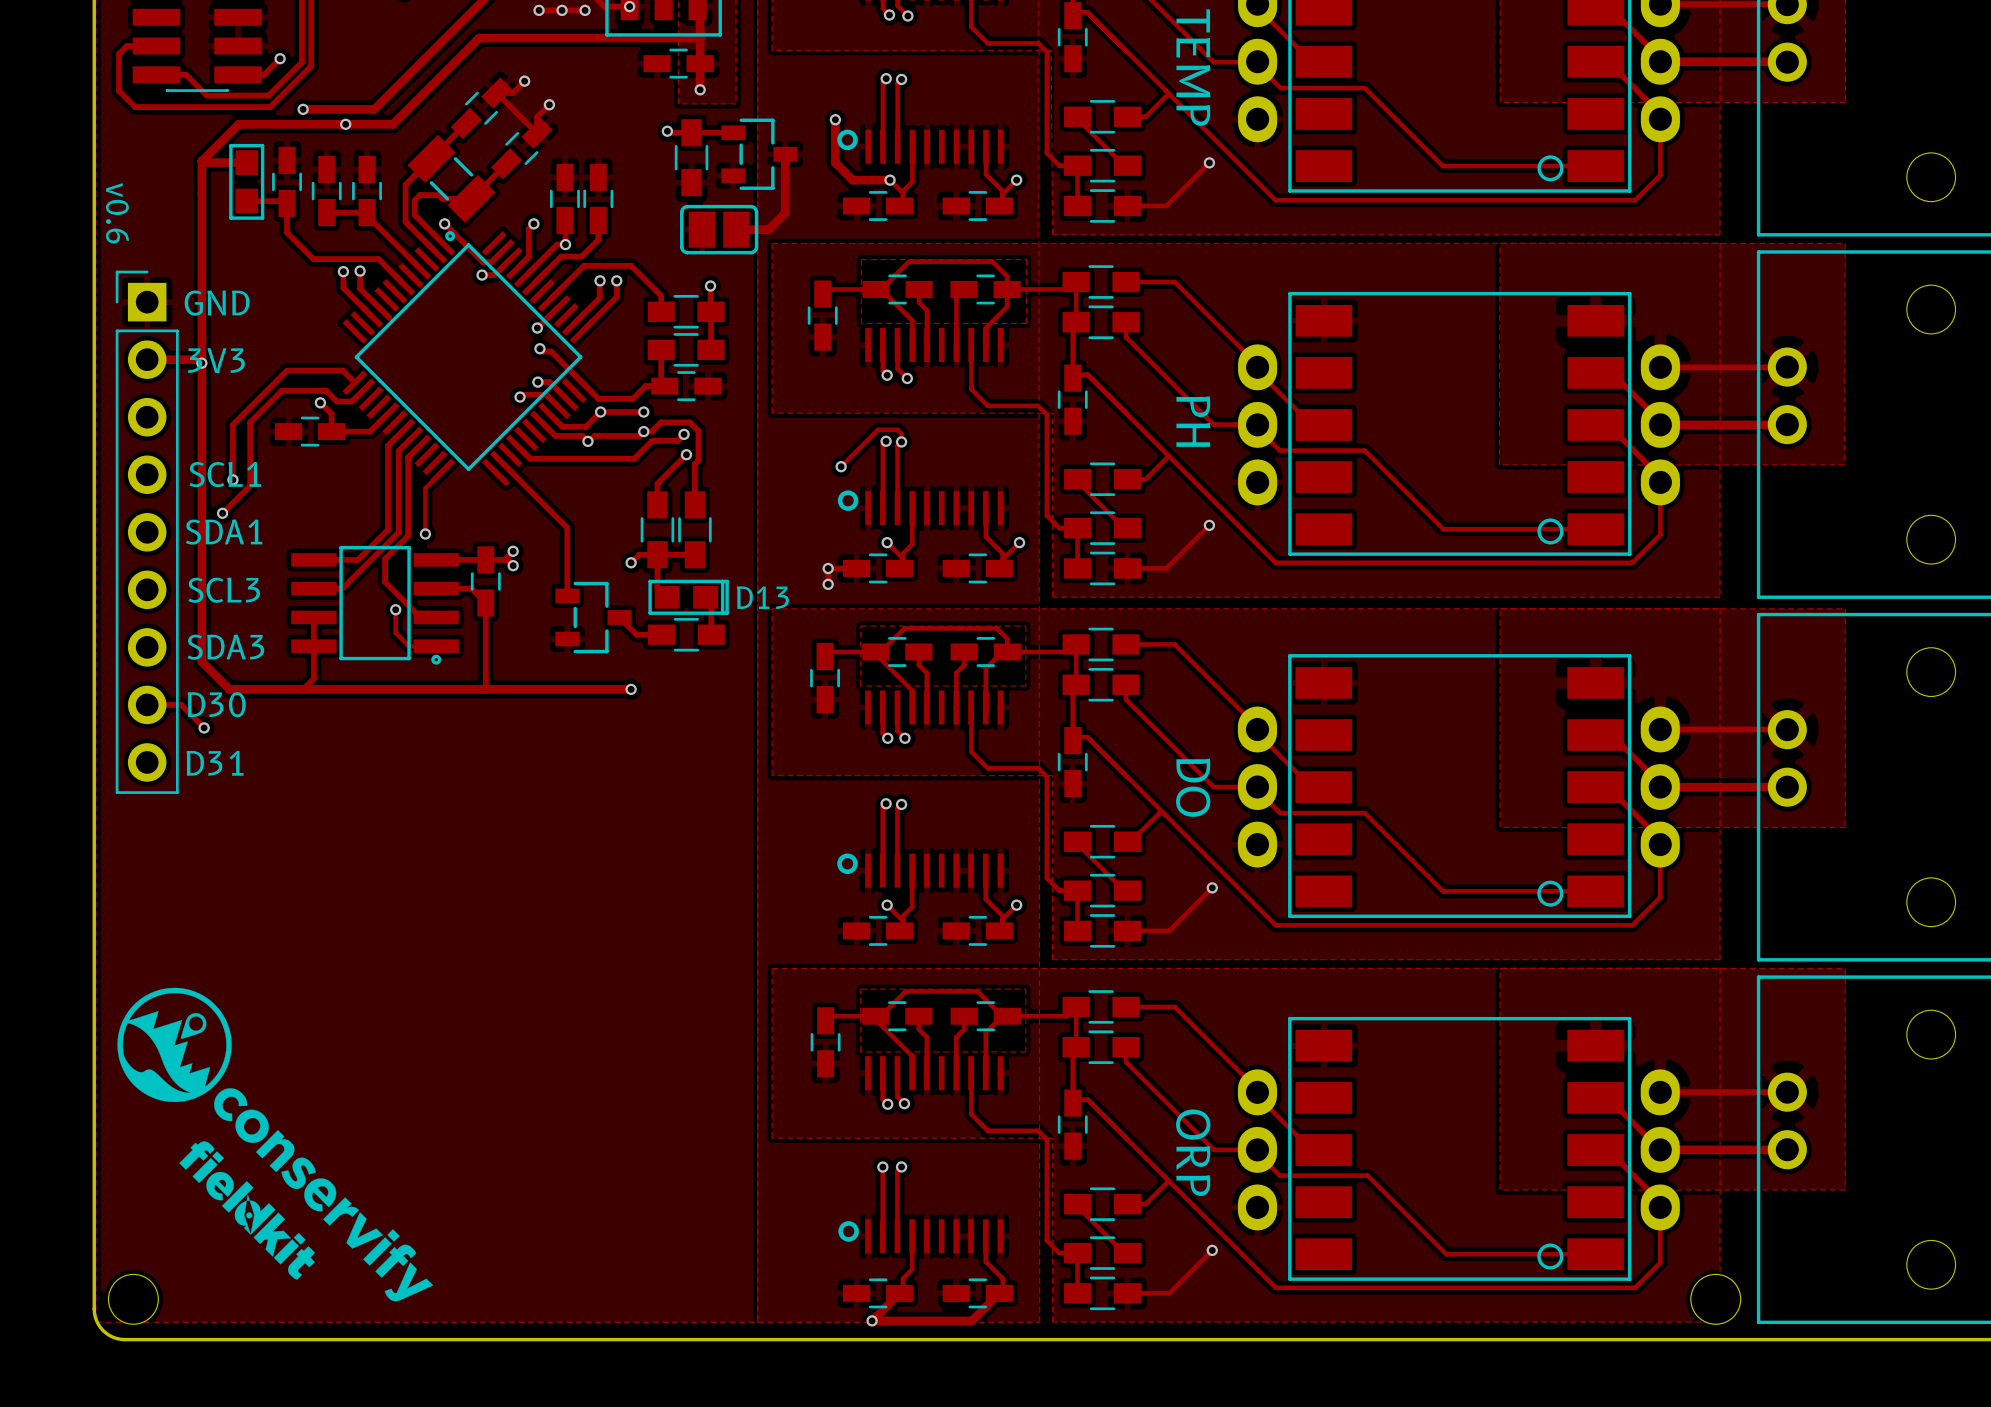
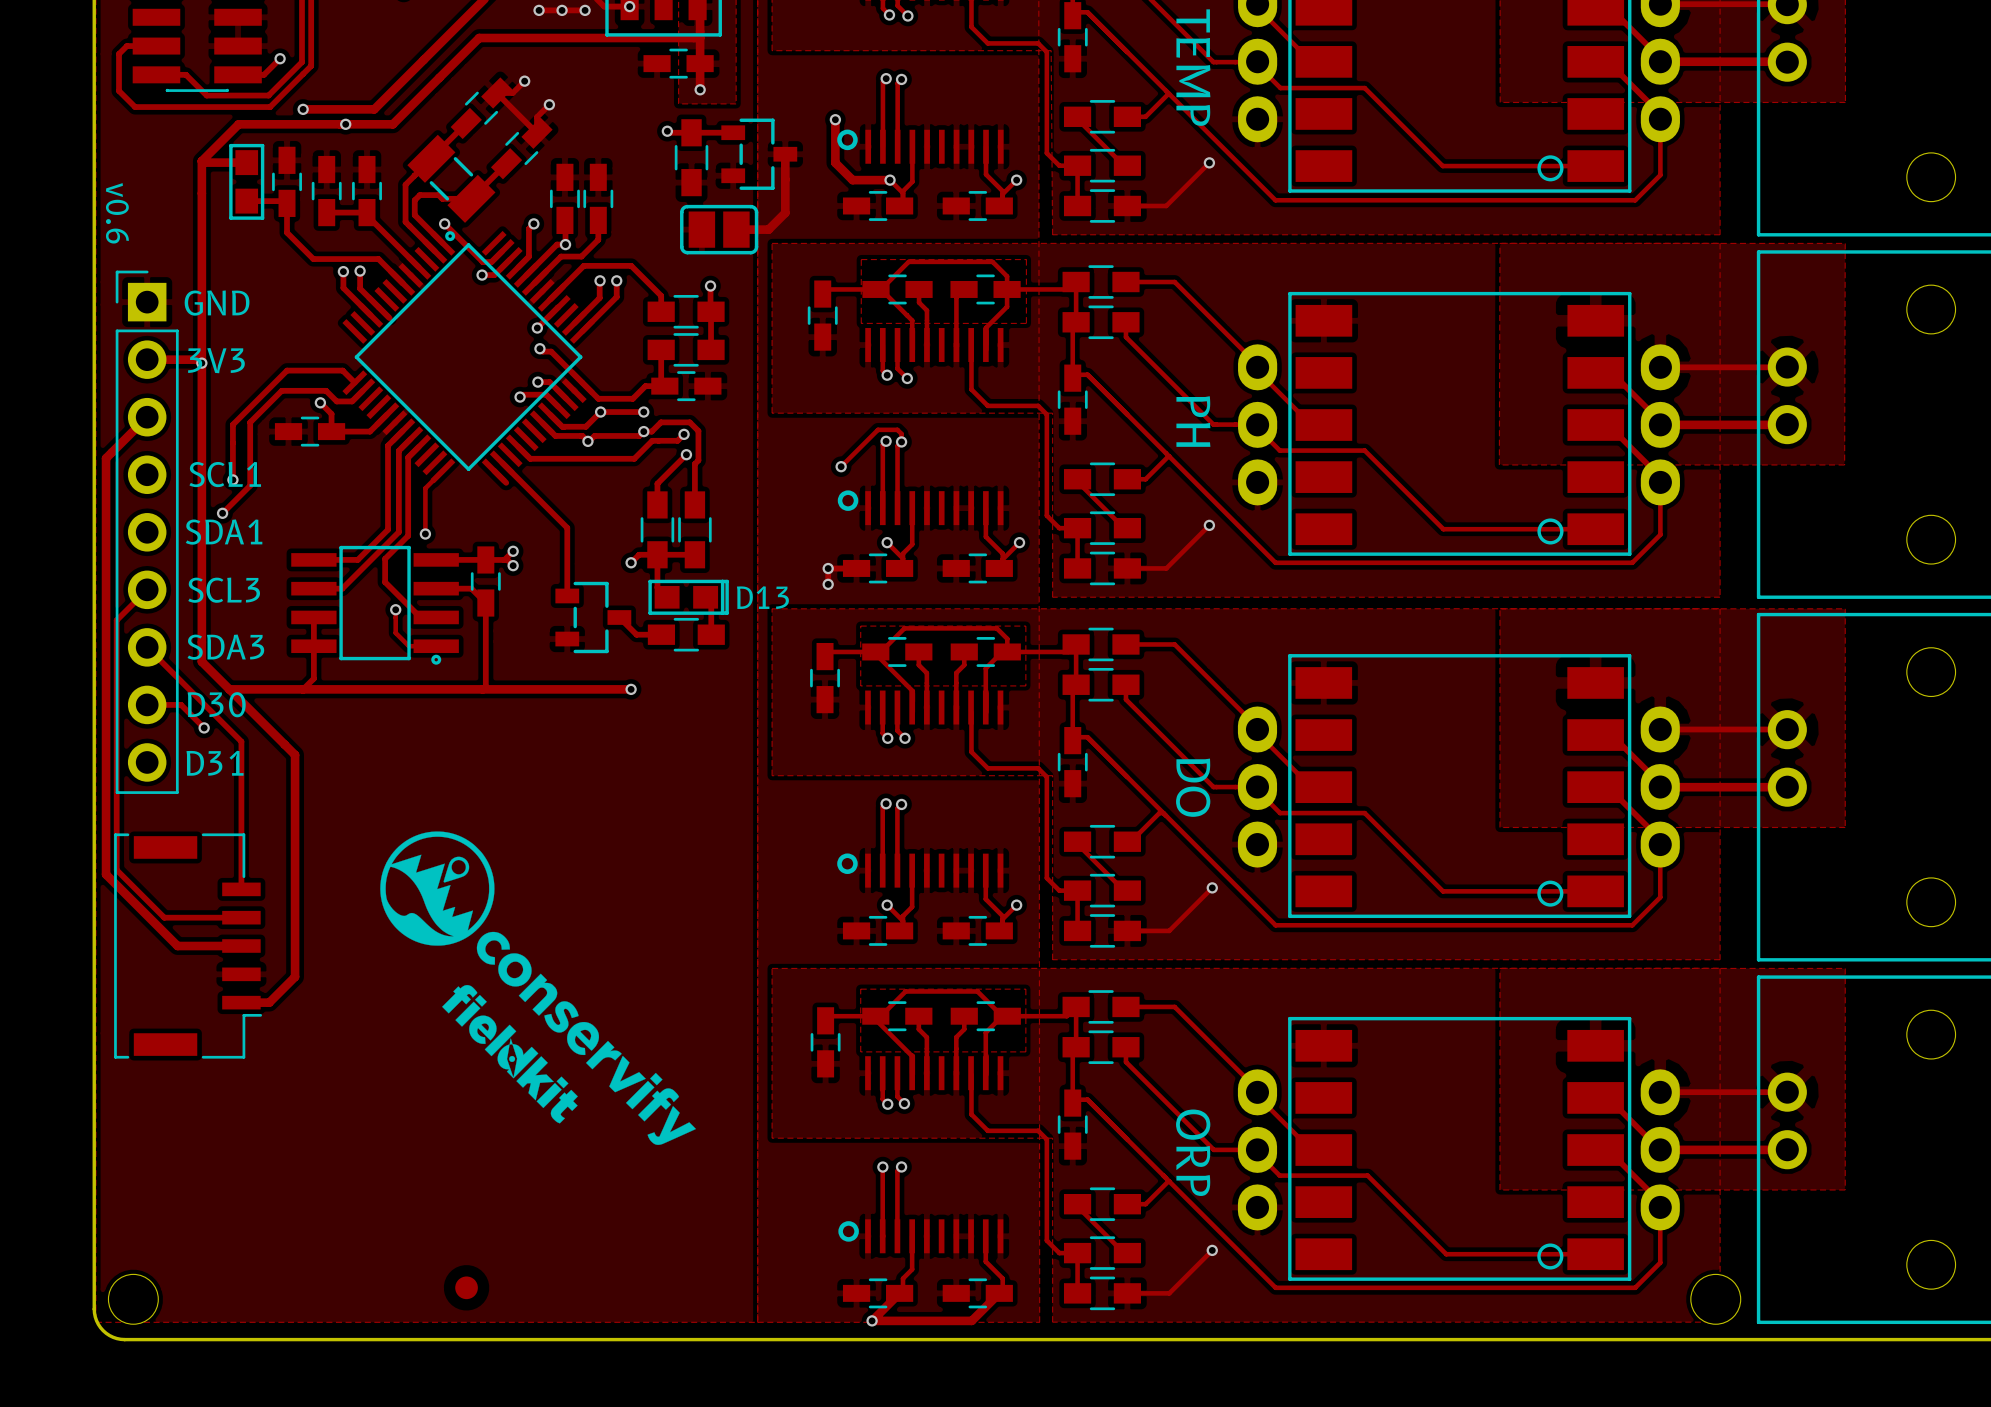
track: none -> (147, 417) (106, 458) (106, 874) (177, 946) (241, 946)
track: none -> (147, 589) (116, 620) (116, 870) (164, 917) (241, 917)
track: none -> (147, 647) (241, 741) (241, 889)
track: none -> (229, 689) (295, 754) (295, 976) (269, 1002) (241, 1002)
part: none -> (188, 946)
drawing position: (275, 1144) -> (538, 988)
drawing position: (247, 1210) -> (509, 1054)
part: none -> (466, 1287)

